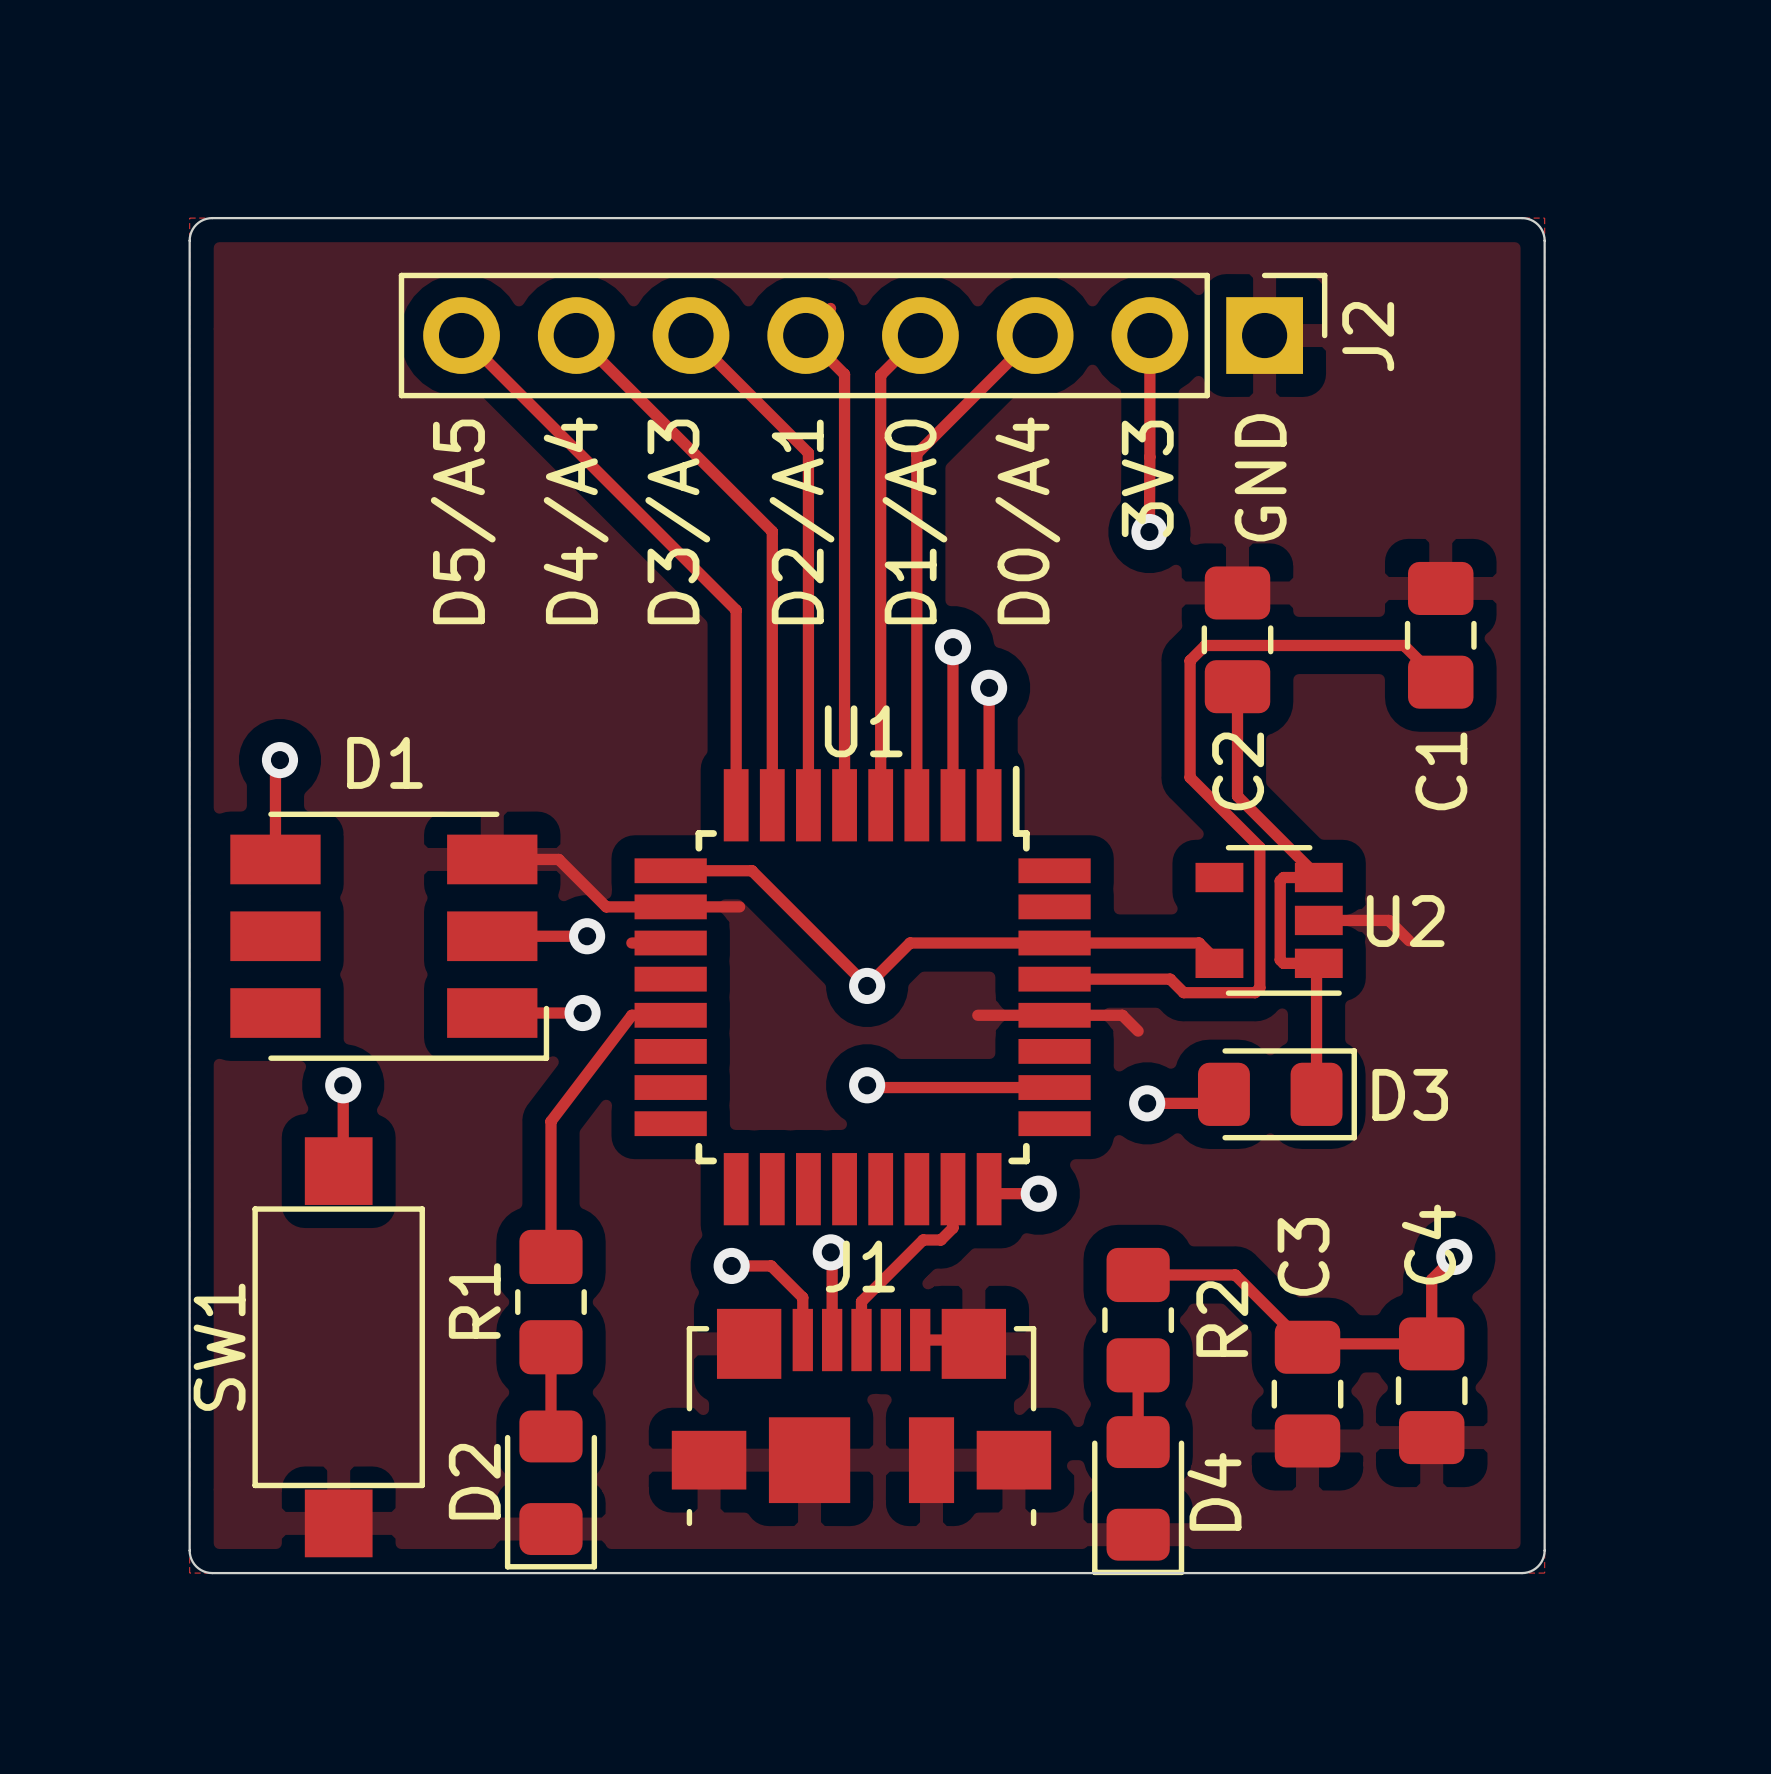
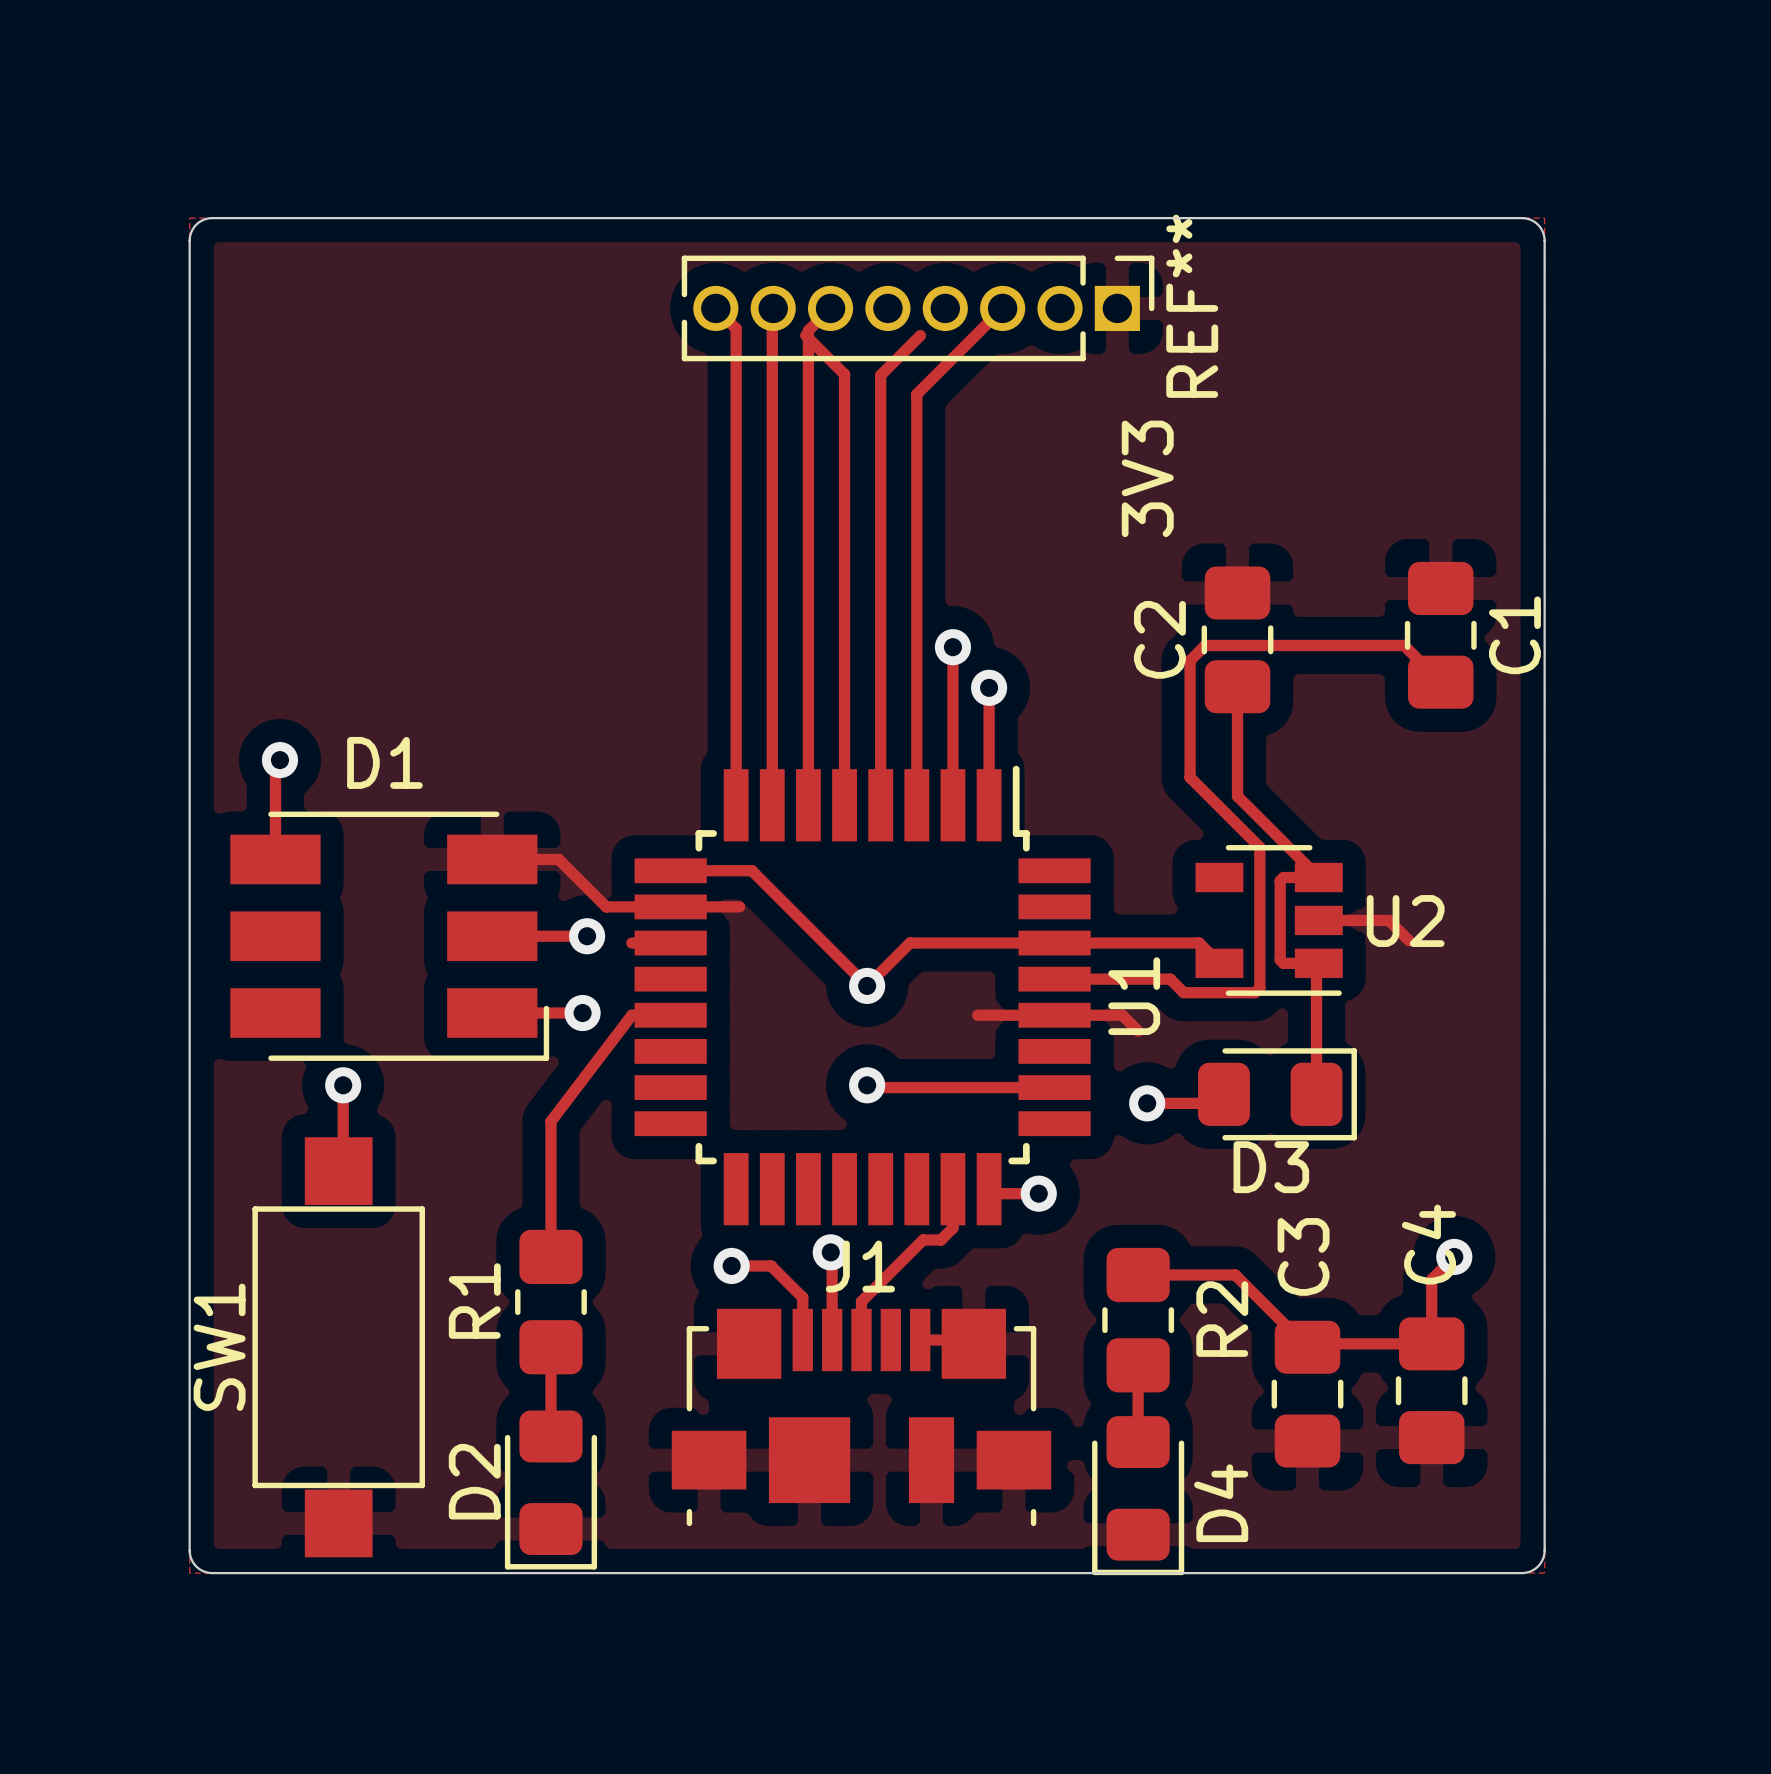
REF**: none -> (918, 308)
track: (461, 335) (736, 610) -> (715, 308) (736, 328) (736, 610)
track: (576, 335) (772, 531) -> (773, 308) (772, 531)
track: (690, 335) (808, 452) -> (808, 330) (808, 452)
J2: (863, 335) -> none
track: (1035, 335) (916, 453) -> (1002, 308) (916, 394) (916, 453)
track: (1149, 335) (1149, 532) -> none
text: GND (1260, 477) -> none
text: D4/A4 (576, 520) -> none
text: D0/A4 (1027, 520) -> none
text: D5/A5 (463, 521) -> none
text: D3/A3 (677, 521) -> none
text: D2/A1 (802, 521) -> none
text: D1/A0 (914, 521) -> none
via: (1149, 532) -> none
U1 name rotation: 0° (863, 731) -> 90° counterclockwise (1134, 996)
U1 name position: U1 (863, 731) -> U1 (1134, 996)
C2 name position: C2 (1238, 771) -> C2 (1159, 639)
C1 name position: C1 (1441, 771) -> C1 (1514, 635)
D3 name position: D3 (1410, 1094) -> D3 (1271, 1167)
D4 name position: D4 (1214, 1491) -> D4 (1221, 1503)

